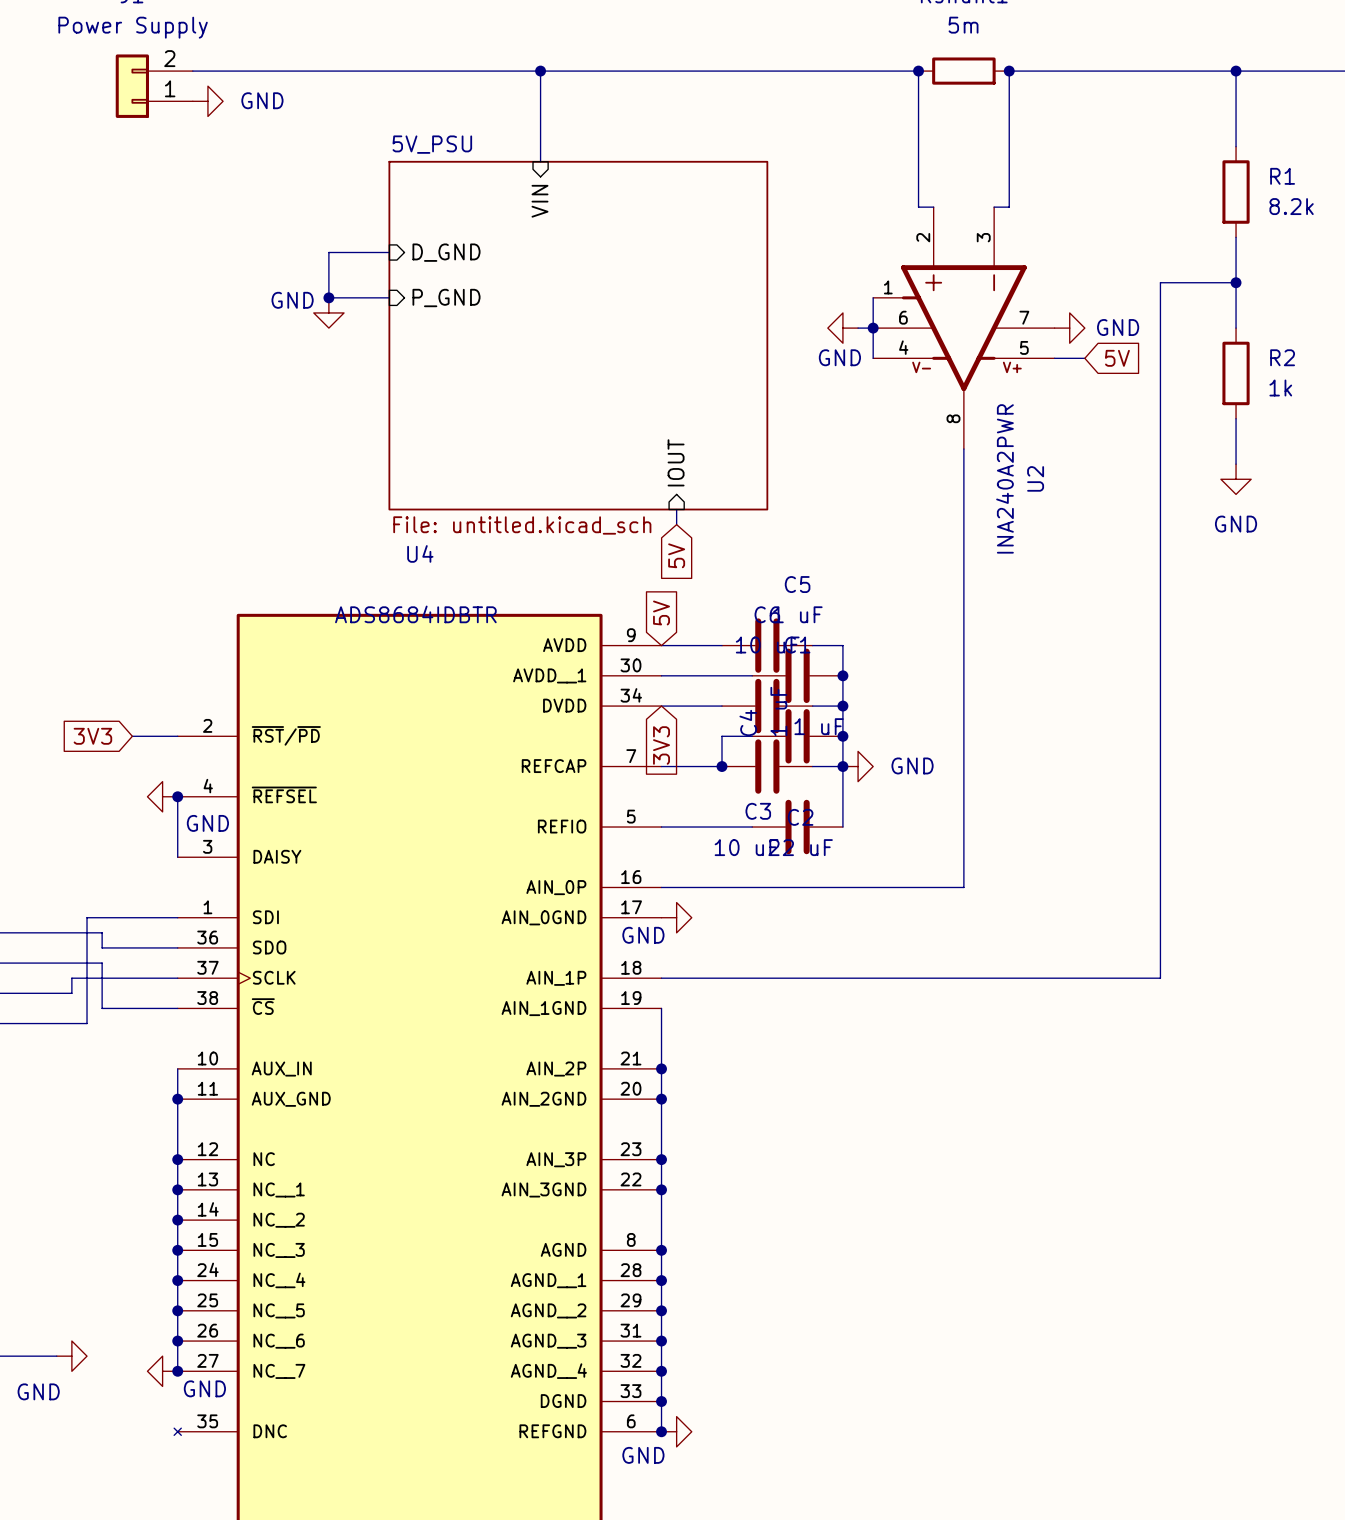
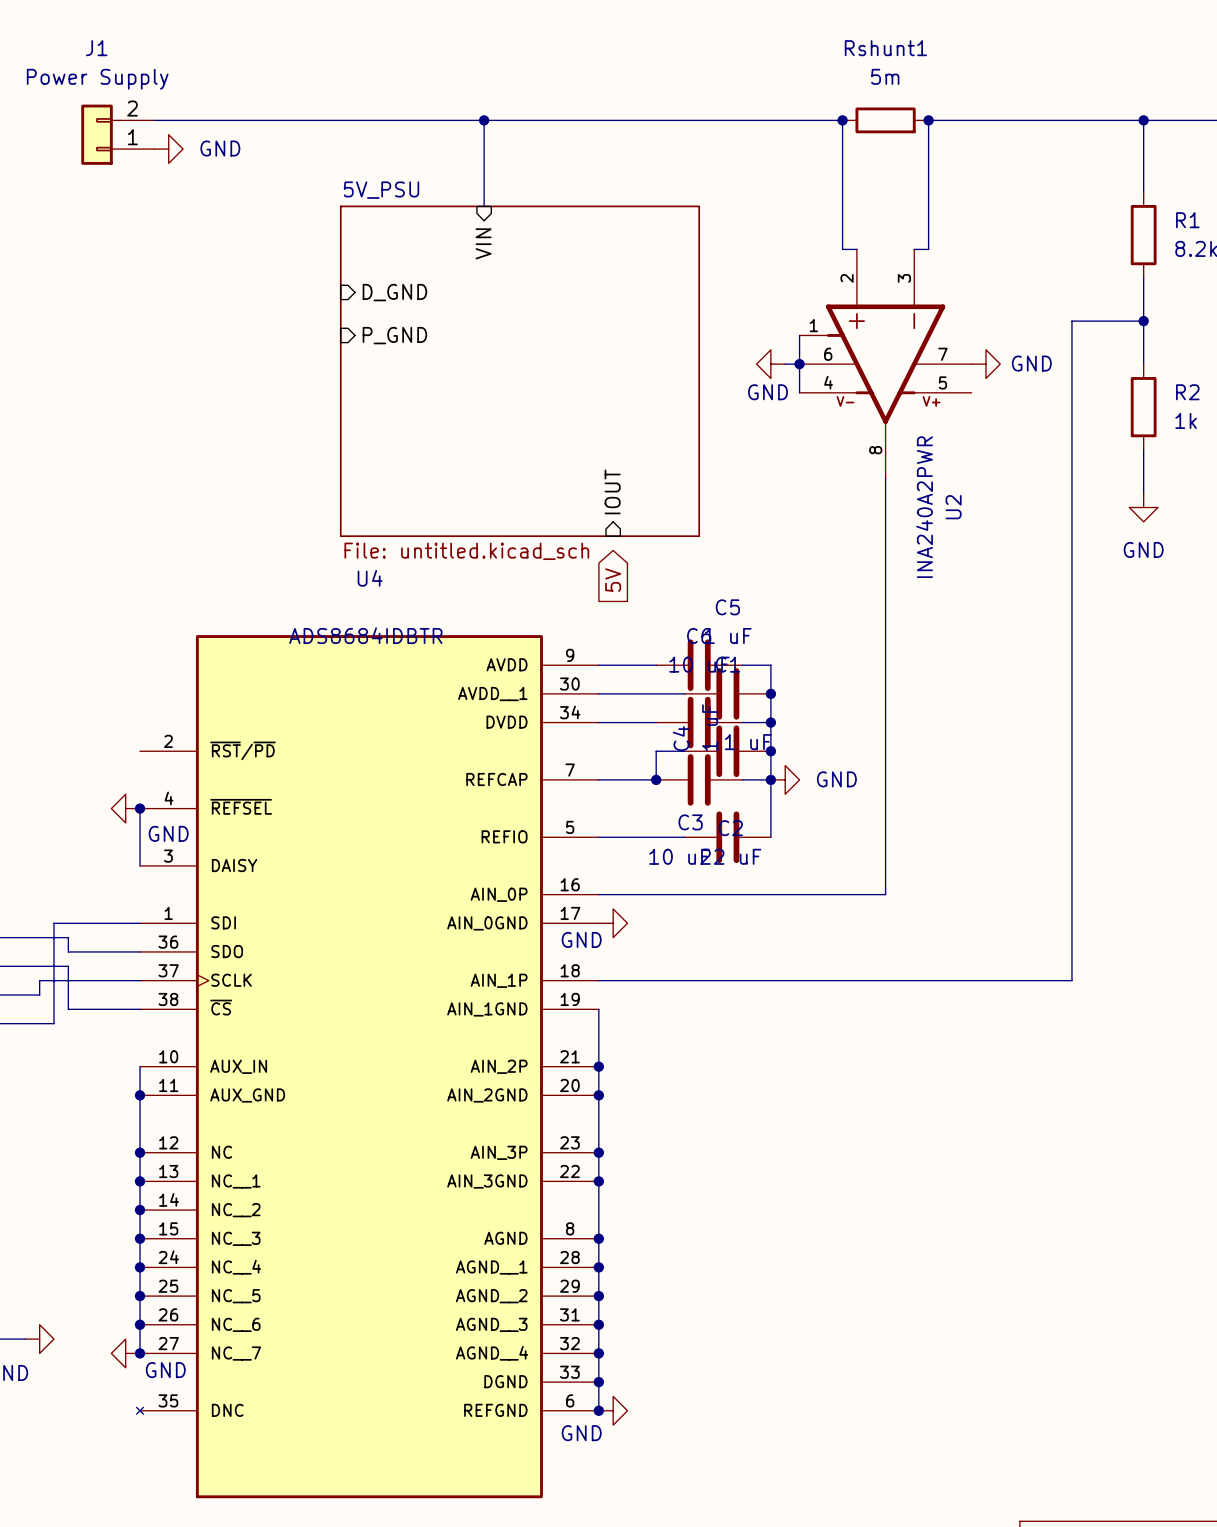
wire: (389, 252) (328, 252) (328, 297) (389, 297) -> none
junction: (328, 297) -> none
power symbol: GND (328, 312) -> none
wire: (1054, 358) (1084, 358) -> none
global label: 5V (1117, 358) -> none
wire: (676, 509) (676, 524) -> none
global label: 5V (661, 612) -> none
global label: 3V3 (92, 736) -> none
wire: (132, 736) (177, 736) -> none
global label: 3V3 (661, 745) -> none

